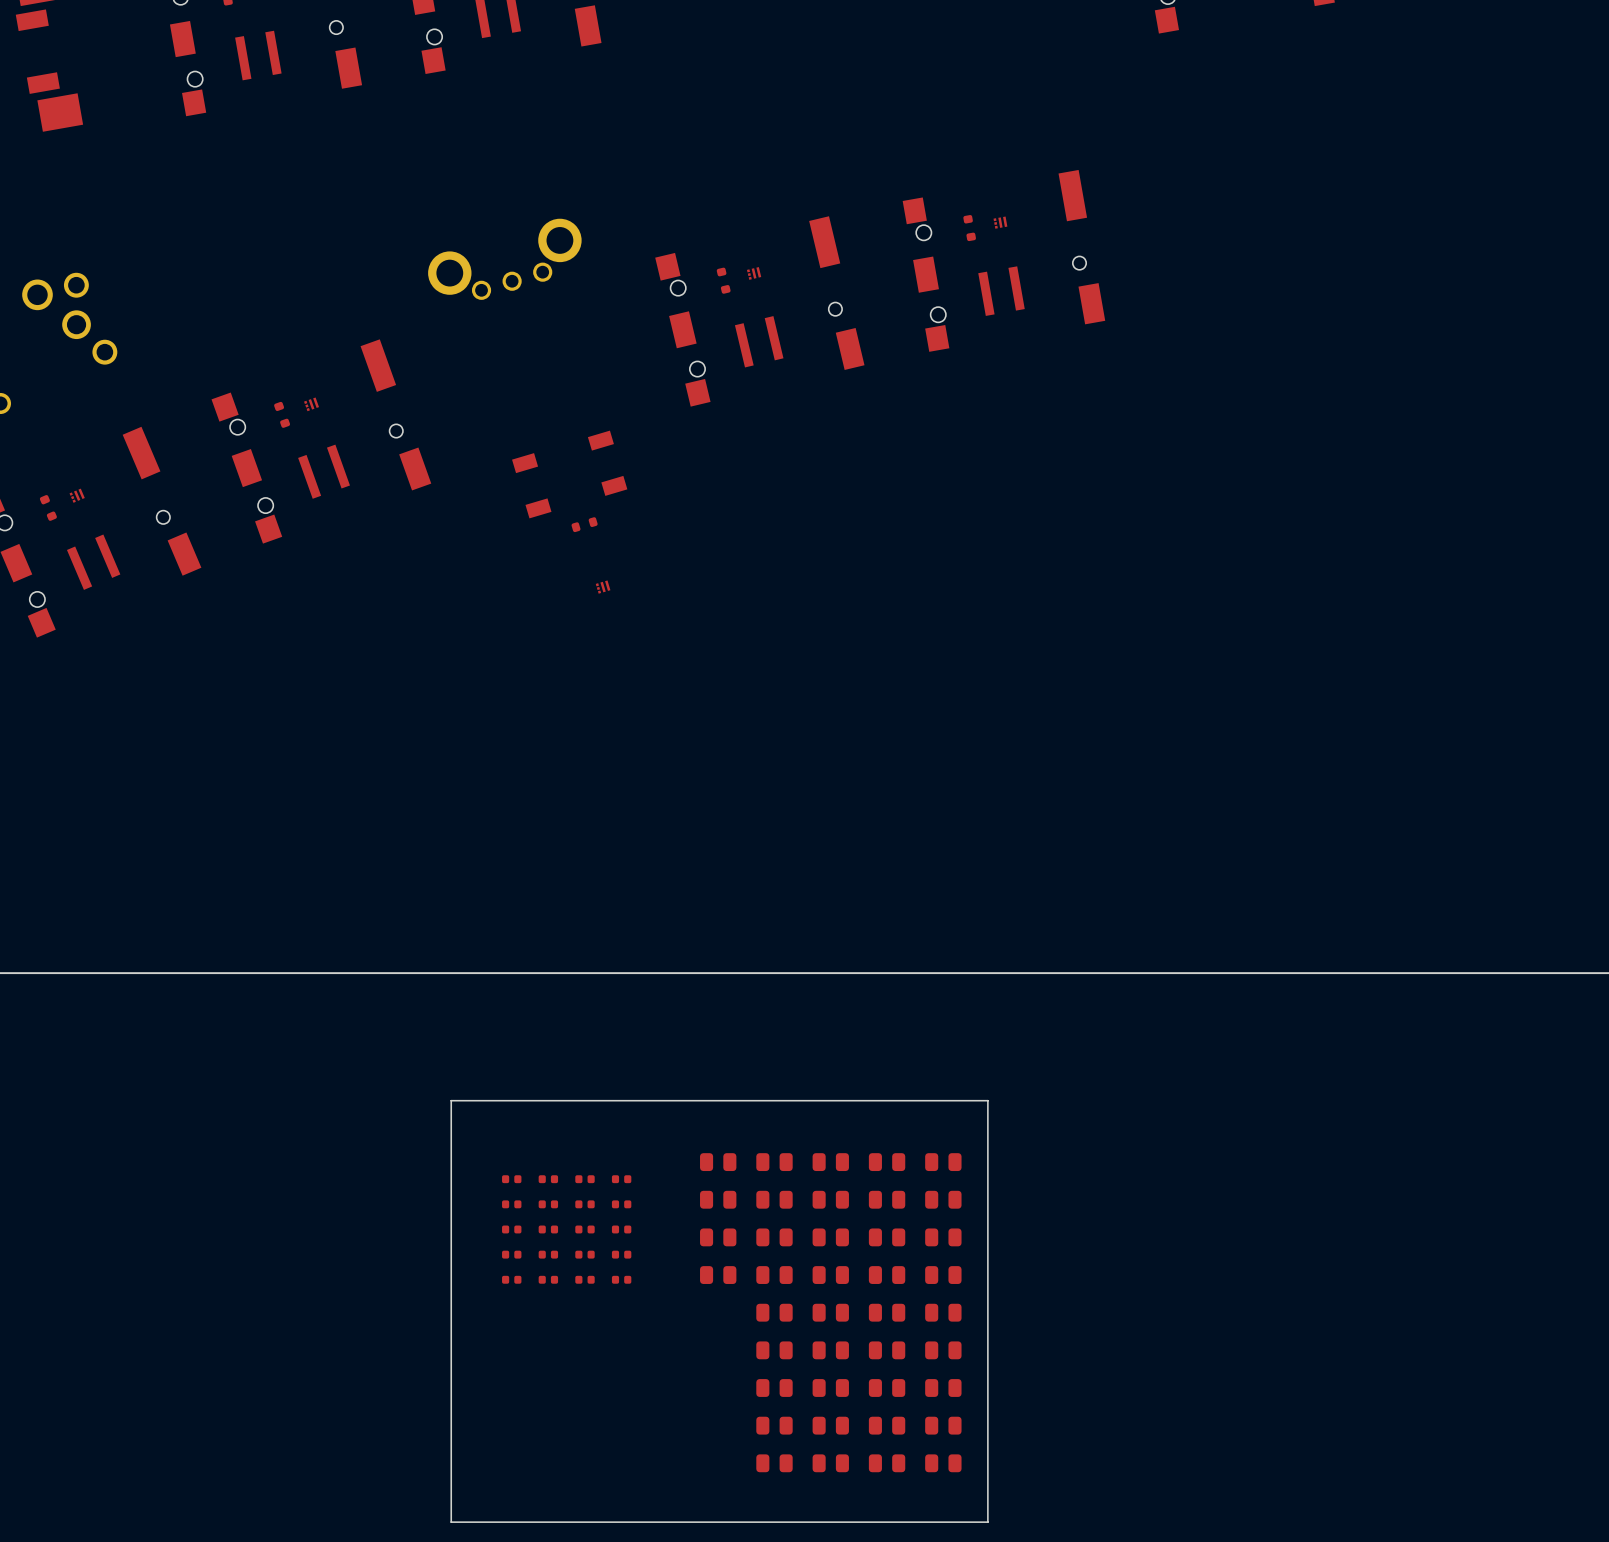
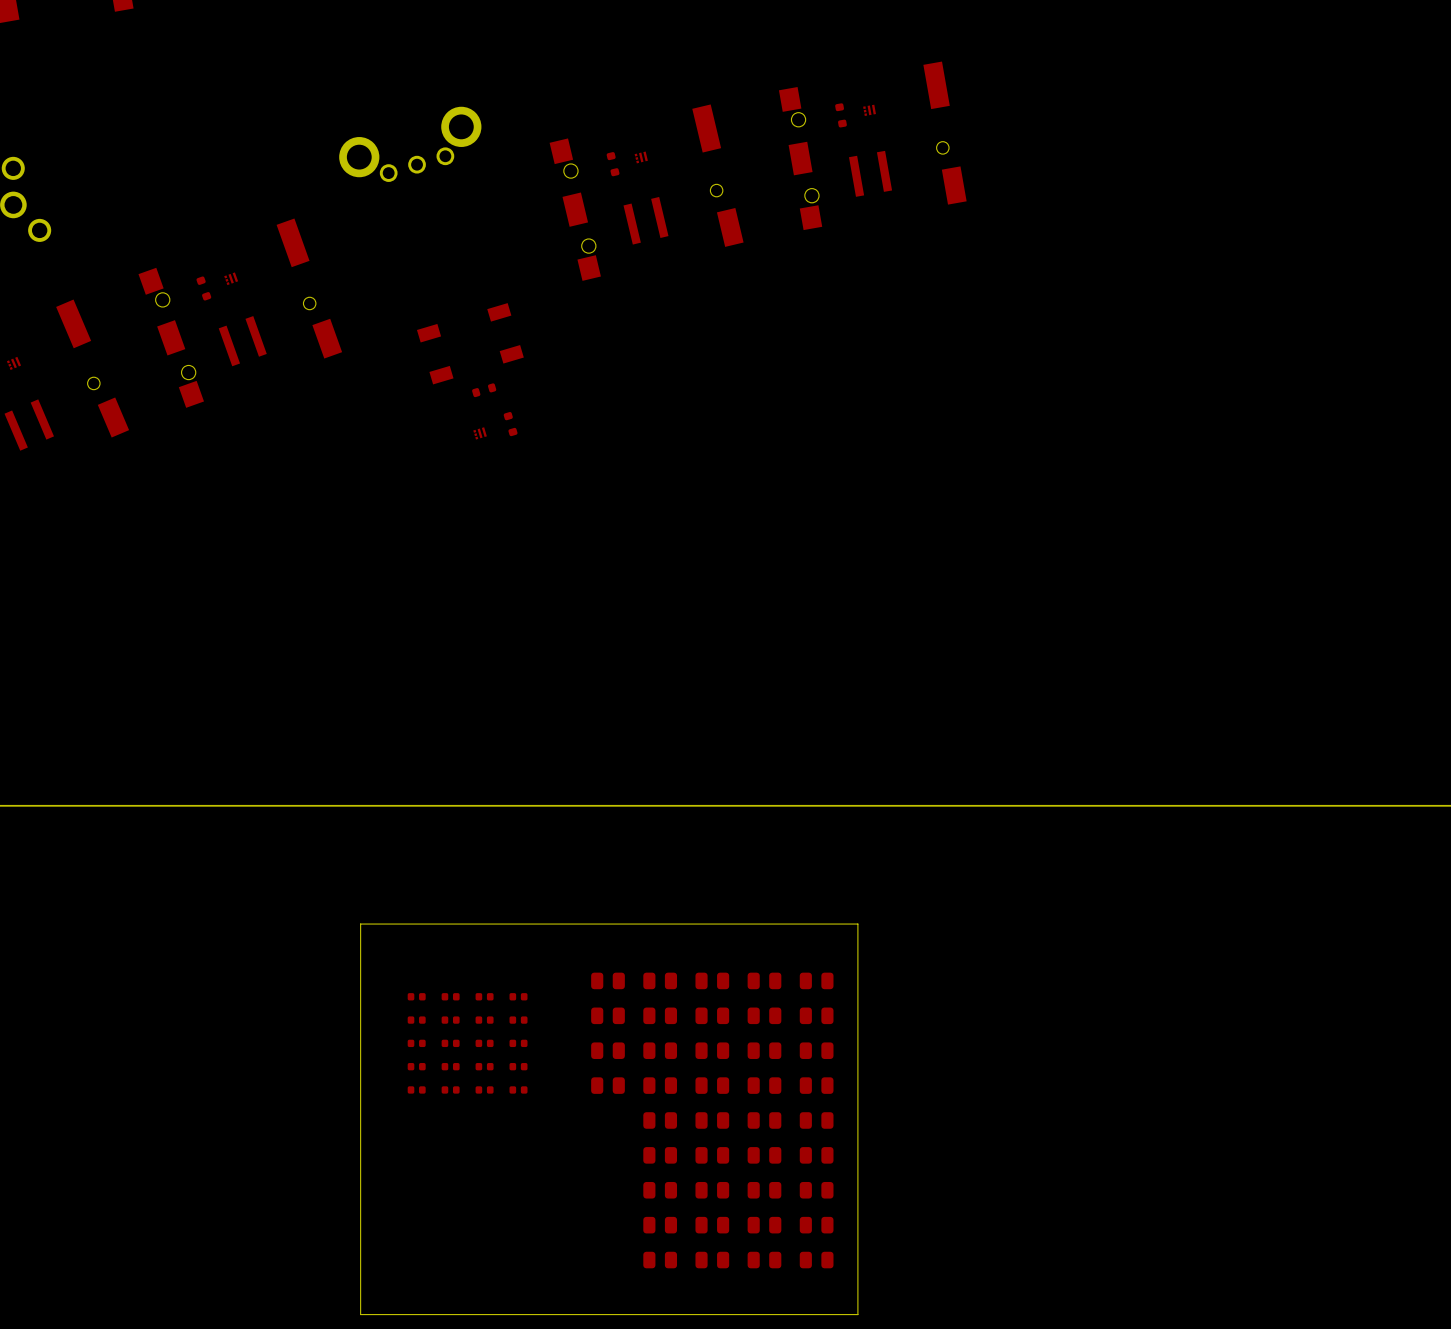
part: none -> (510, 424)
part position: (603, 587) -> (480, 433)

